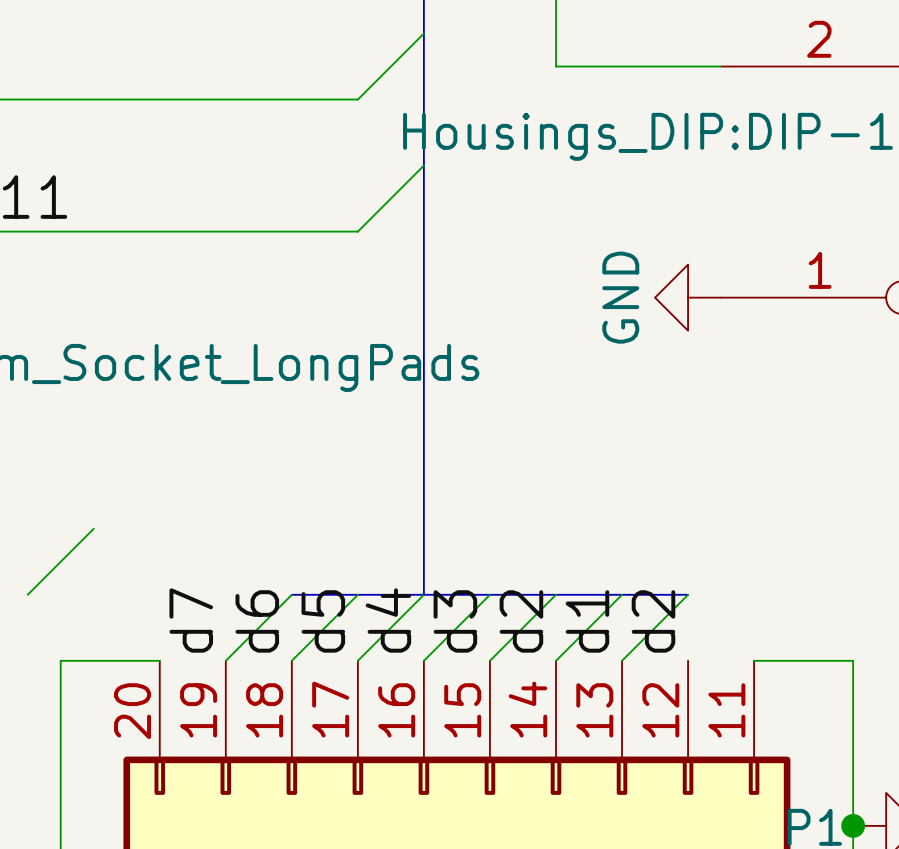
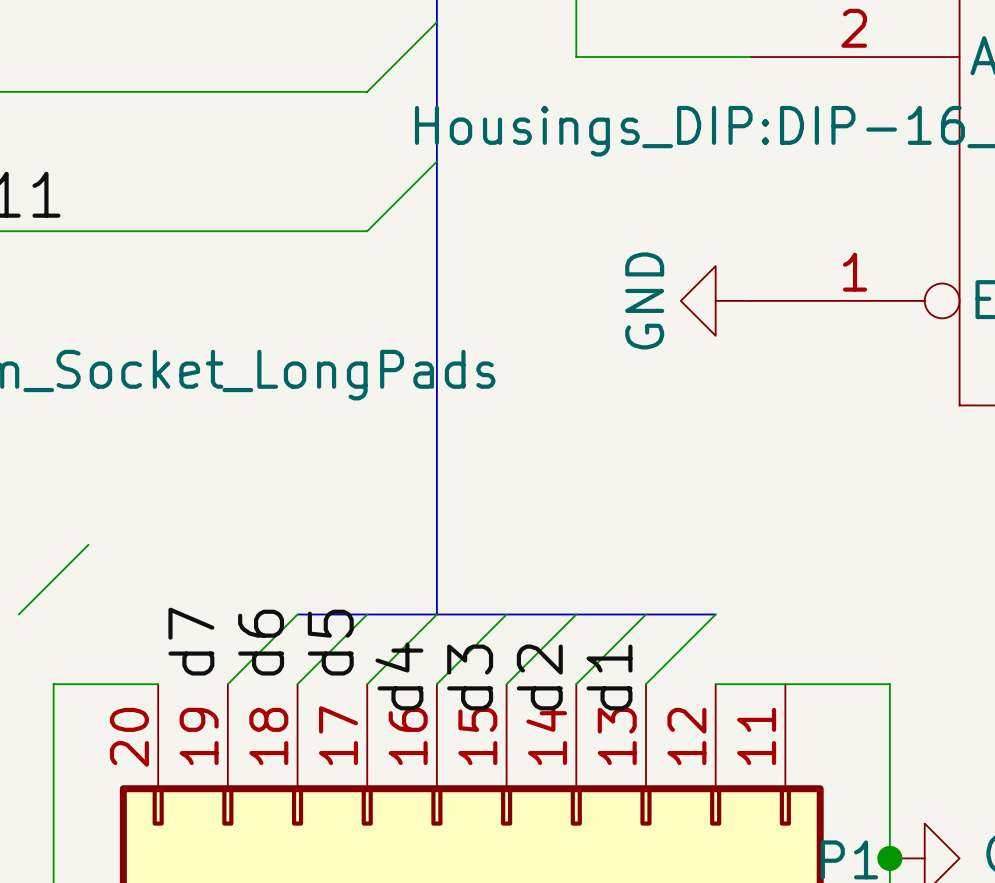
label position: d4 (388, 620) -> d4 (399, 676)
label position: d3 (455, 621) -> d3 (470, 677)
label position: d2 (521, 621) -> d2 (539, 677)
label position: d1 (587, 621) -> d1 (609, 677)
label: d2 (653, 621) -> none
wire: none -> (715, 684) (785, 684)

